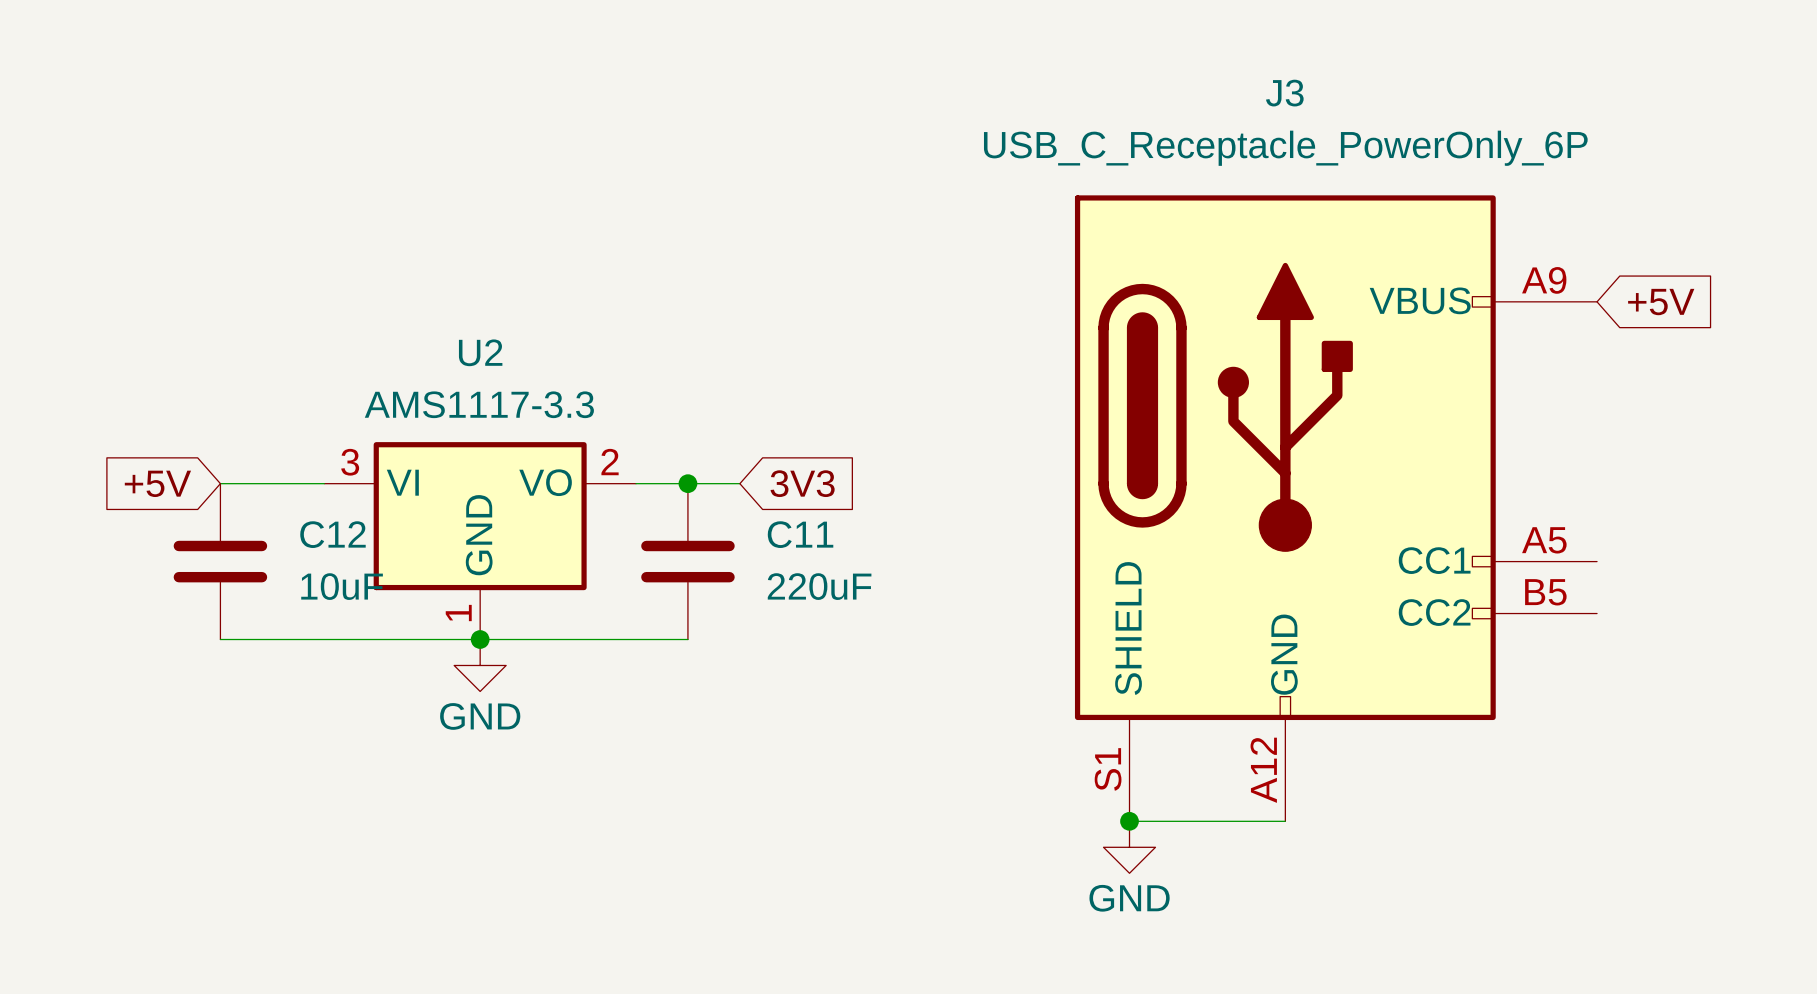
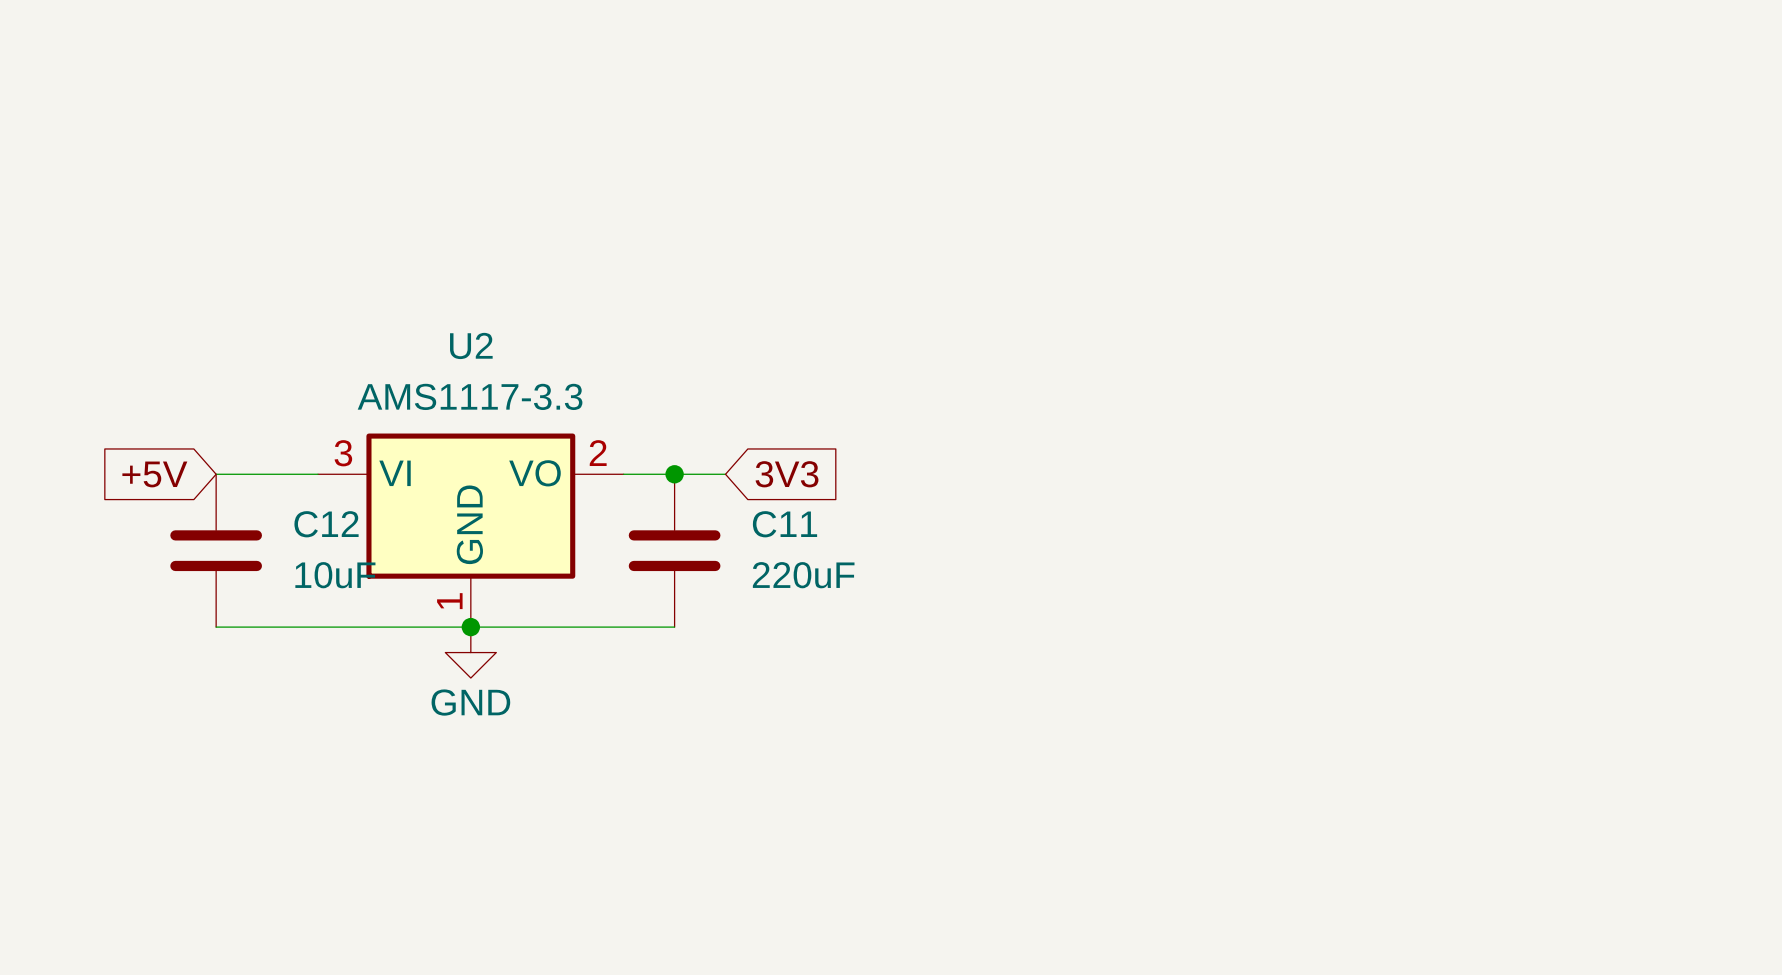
global label: +5V (1661, 302) -> none
J3: USB_C_Receptacle_PowerOnly_6P (1336, 508) -> none
wire: (1129, 821) (1285, 821) -> none
junction: (1129, 821) -> none
power symbol: GND (1129, 847) -> none

